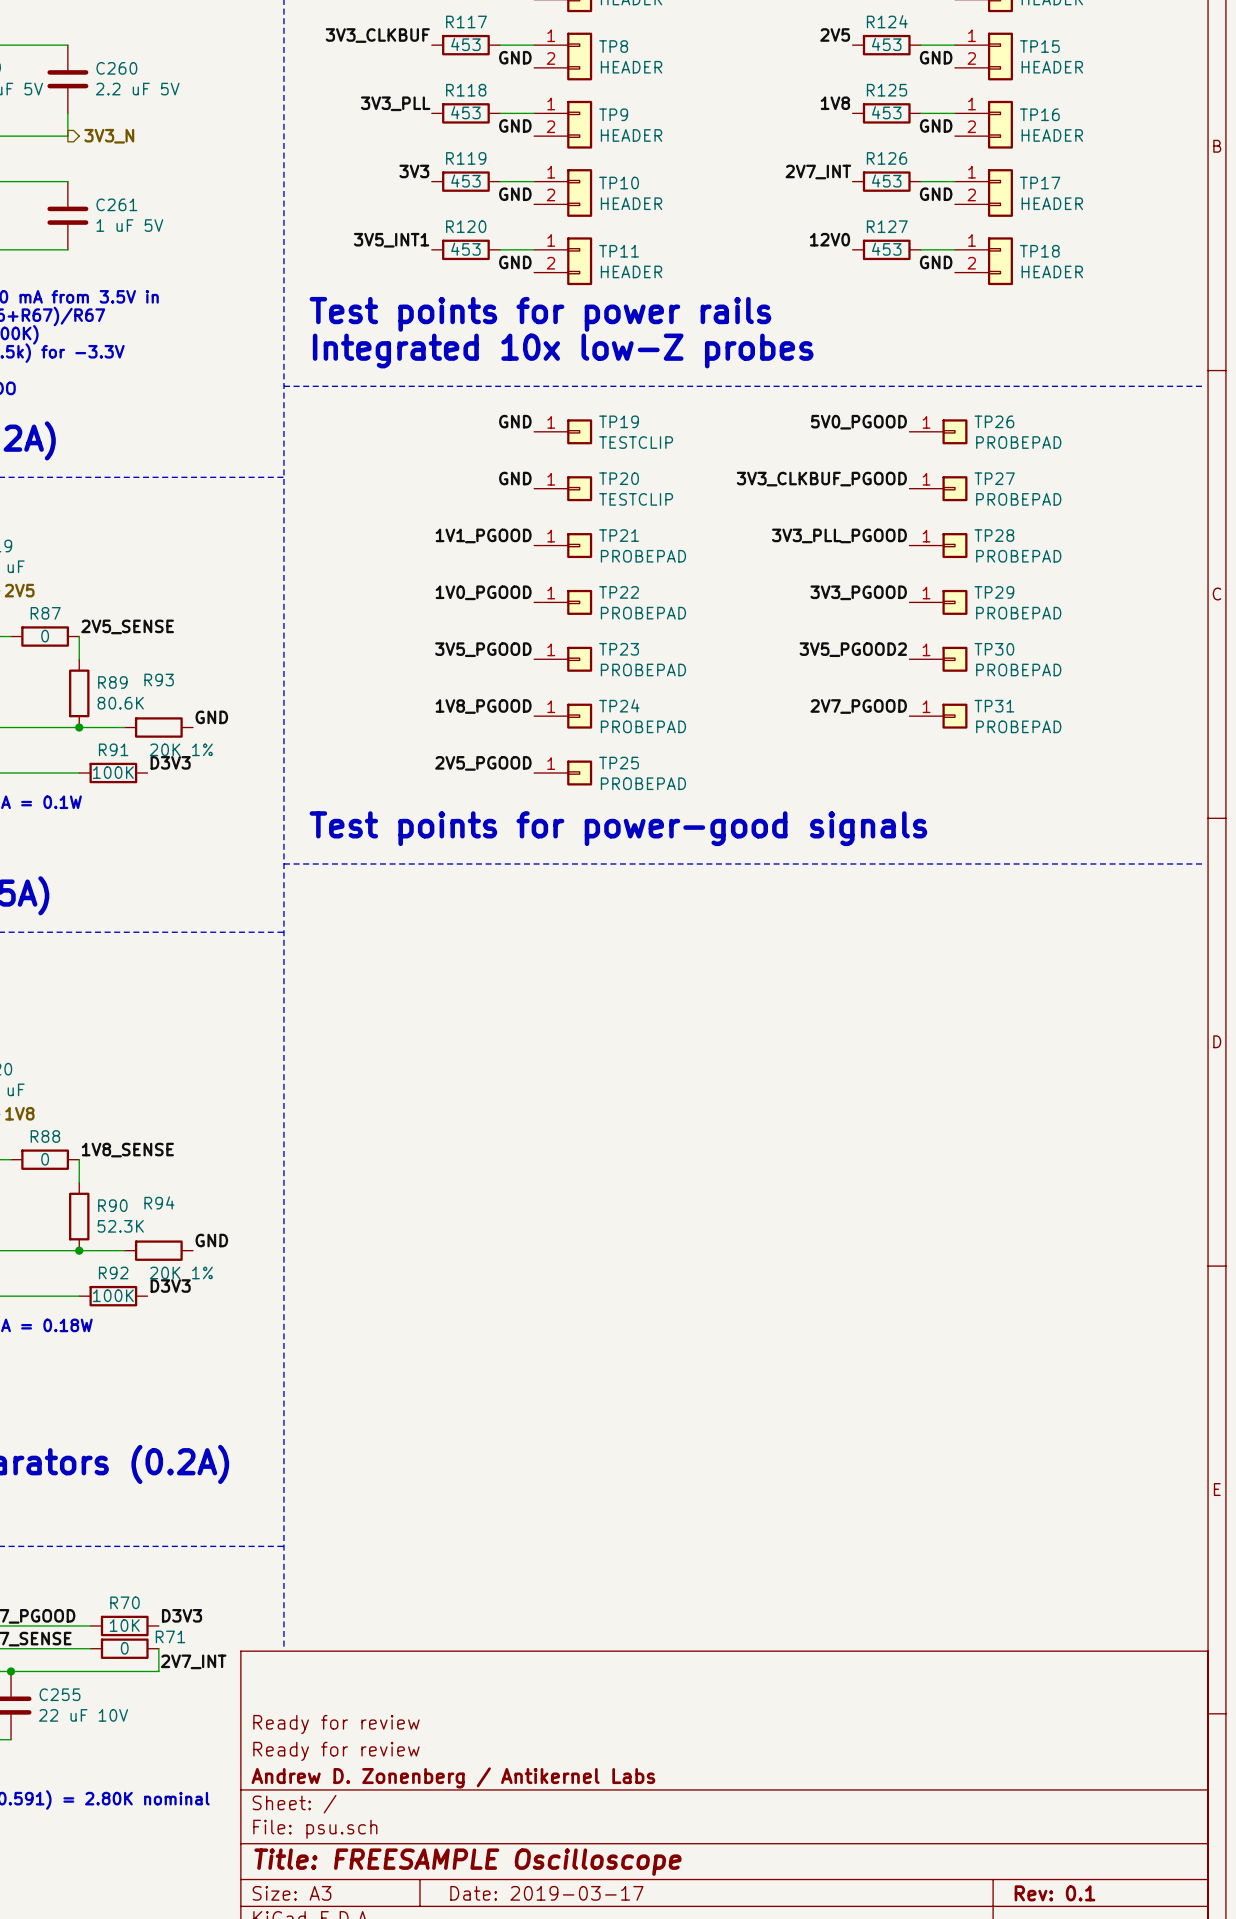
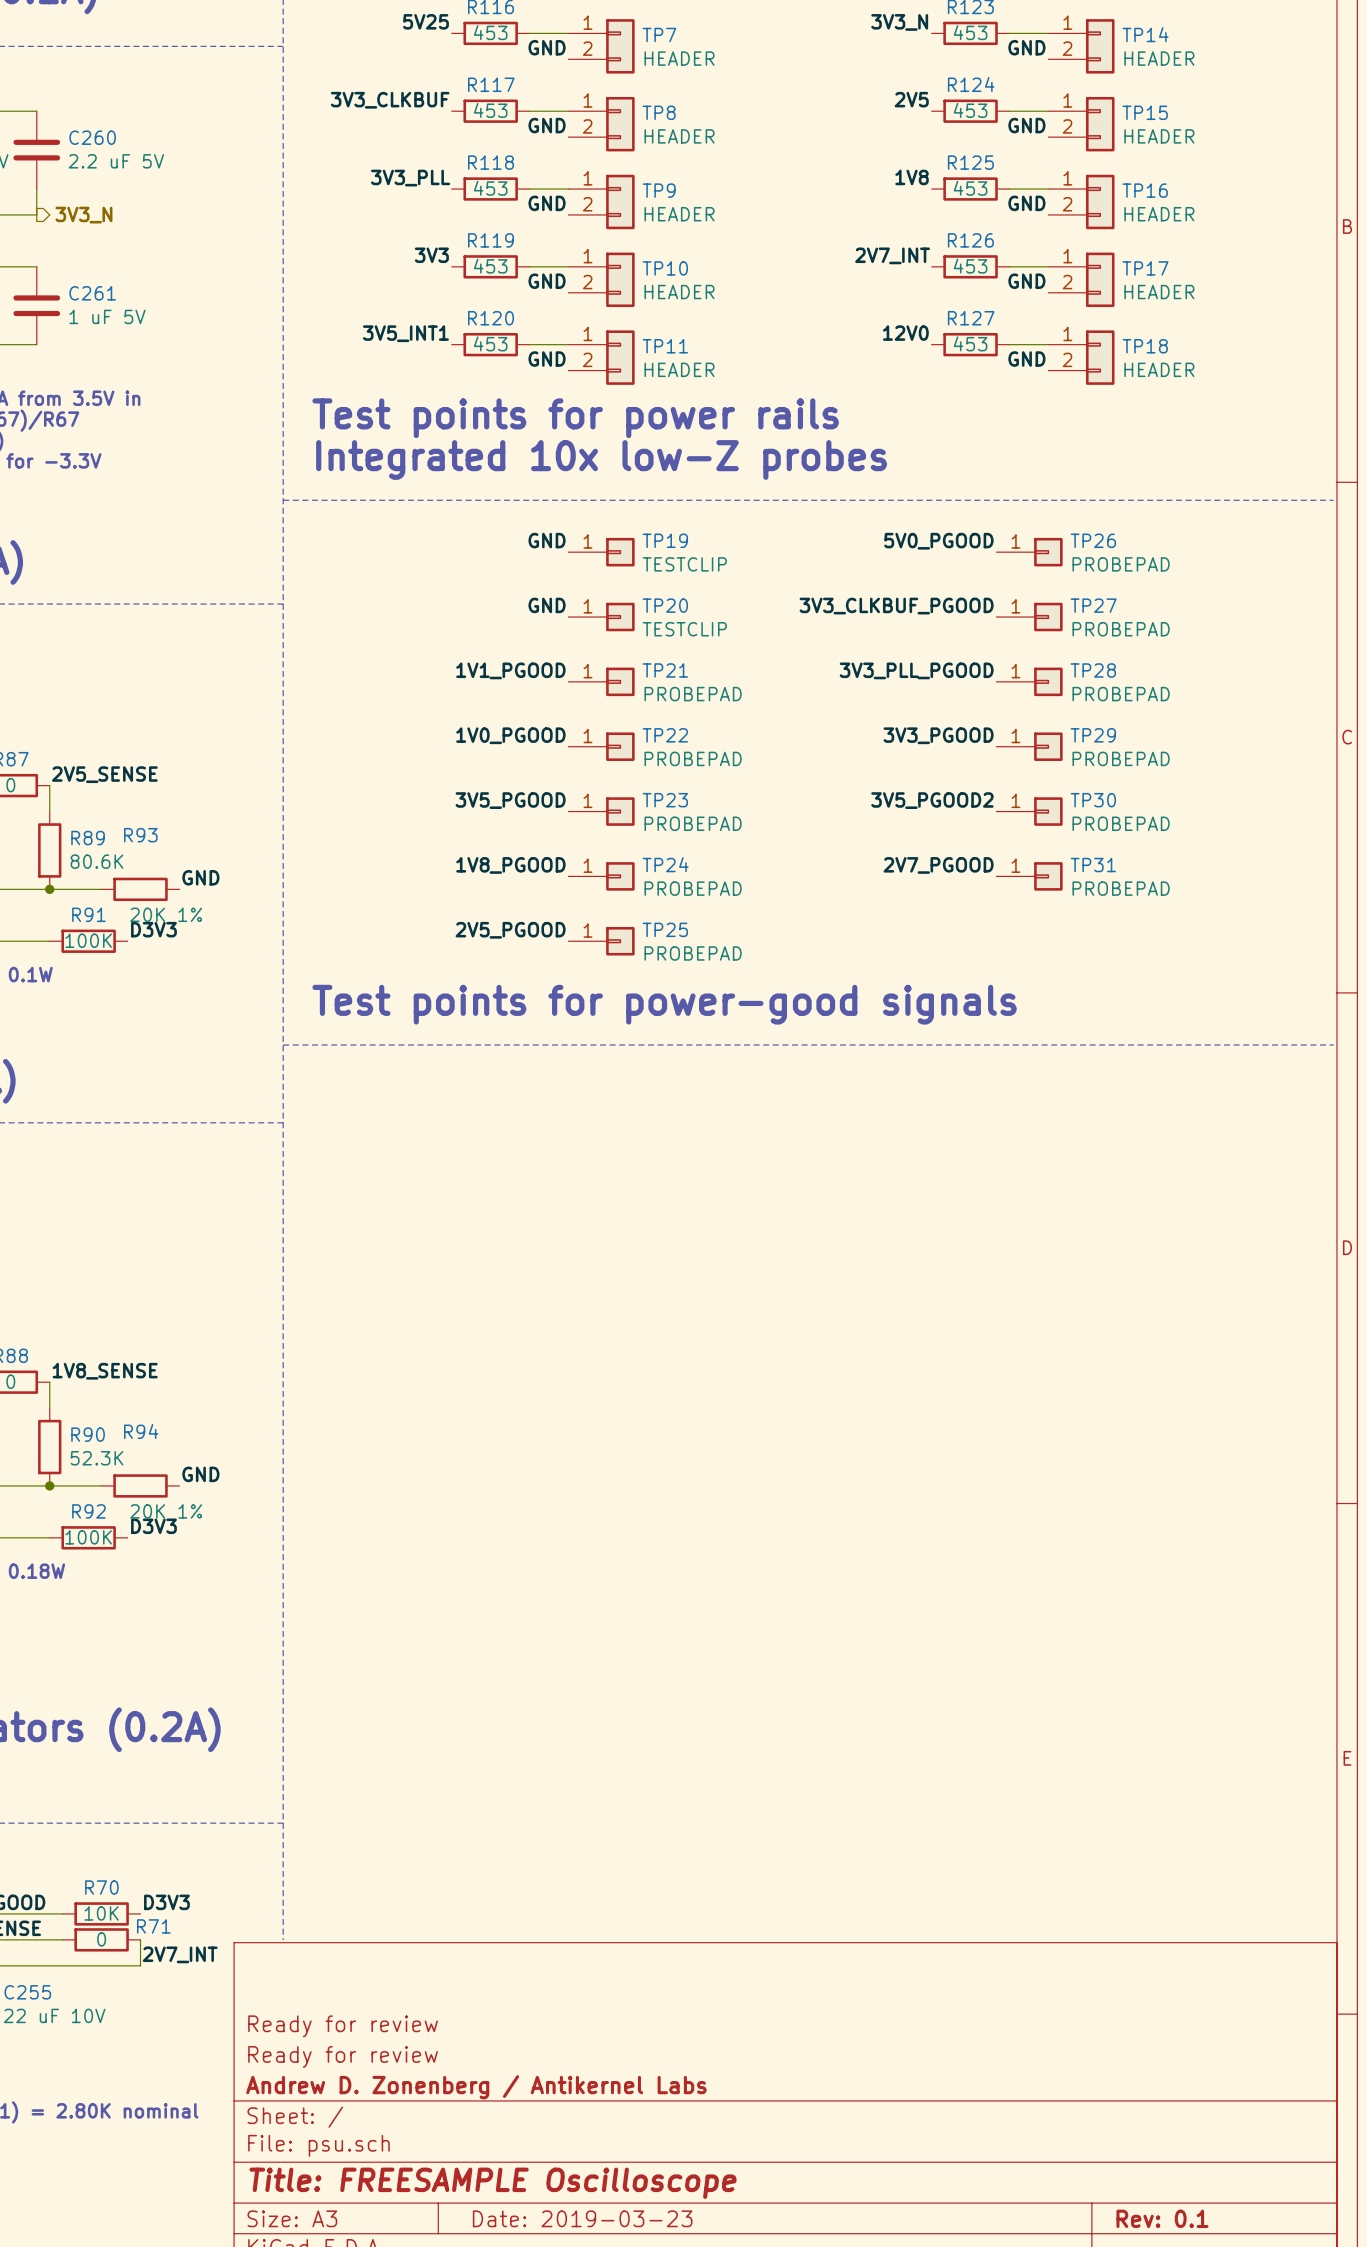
title block: Date: 2019-03-17 (546, 1893) -> Date: 2019-03-23 (582, 2218)

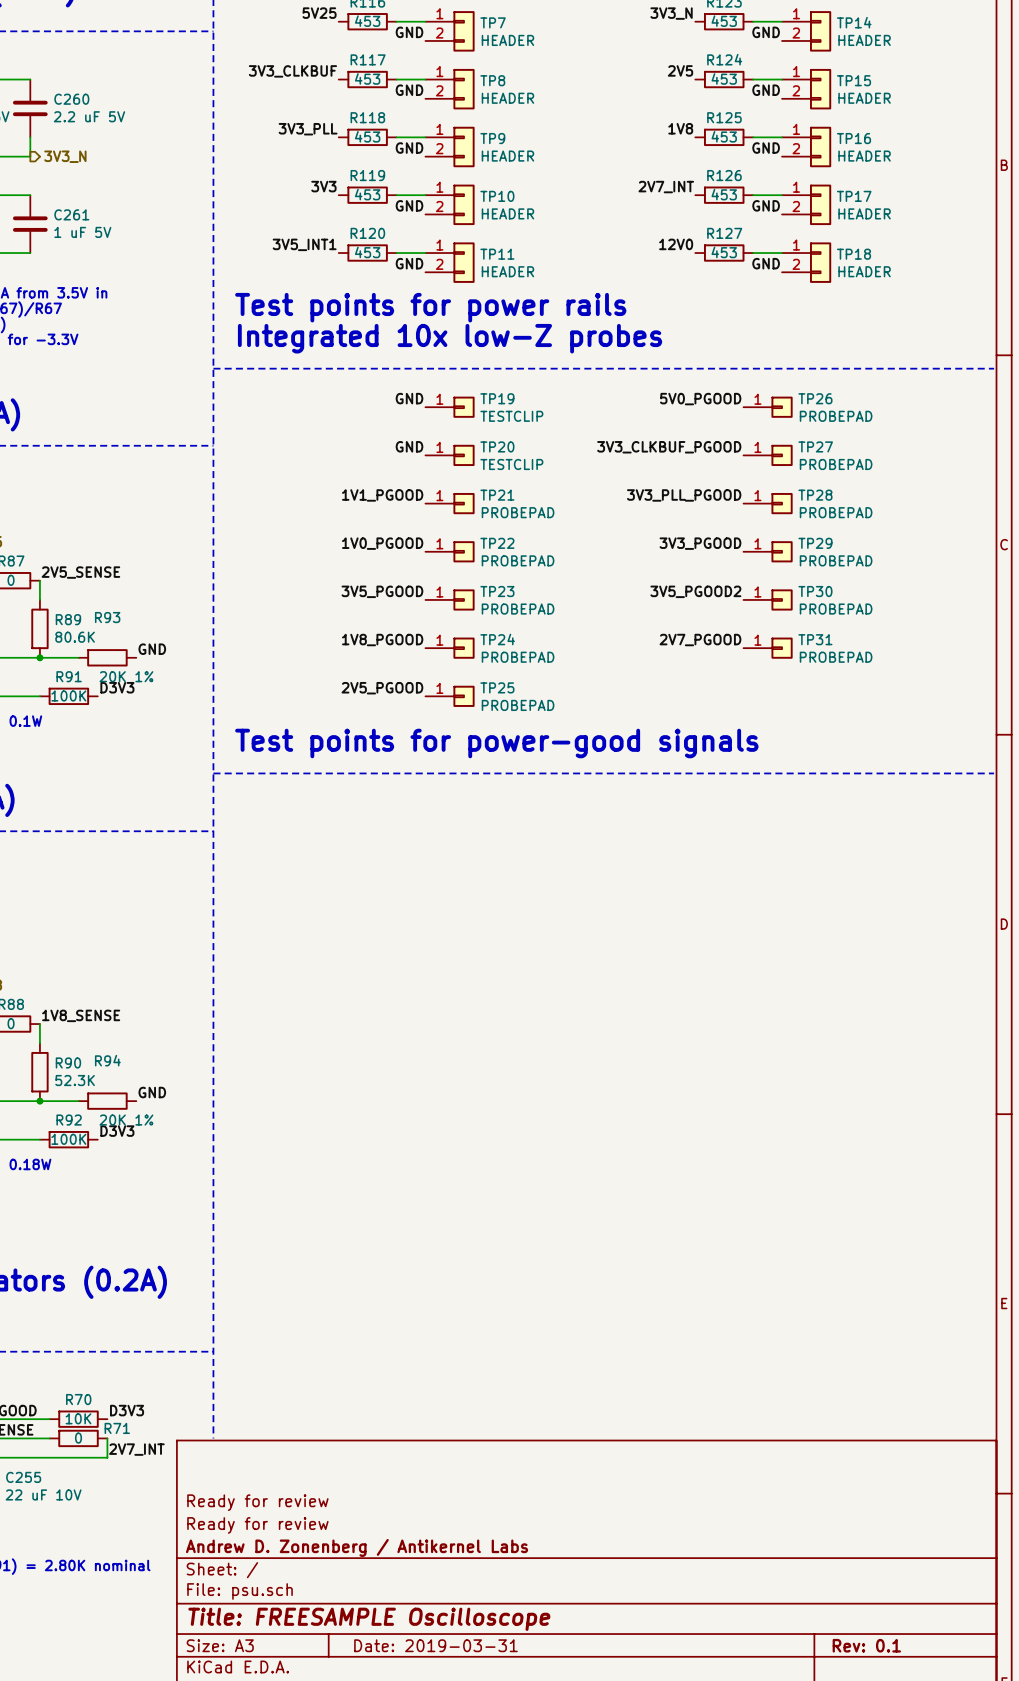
title block: Date: 2019-03-23 (582, 2218) -> Date: 2019-03-31 (435, 1645)

